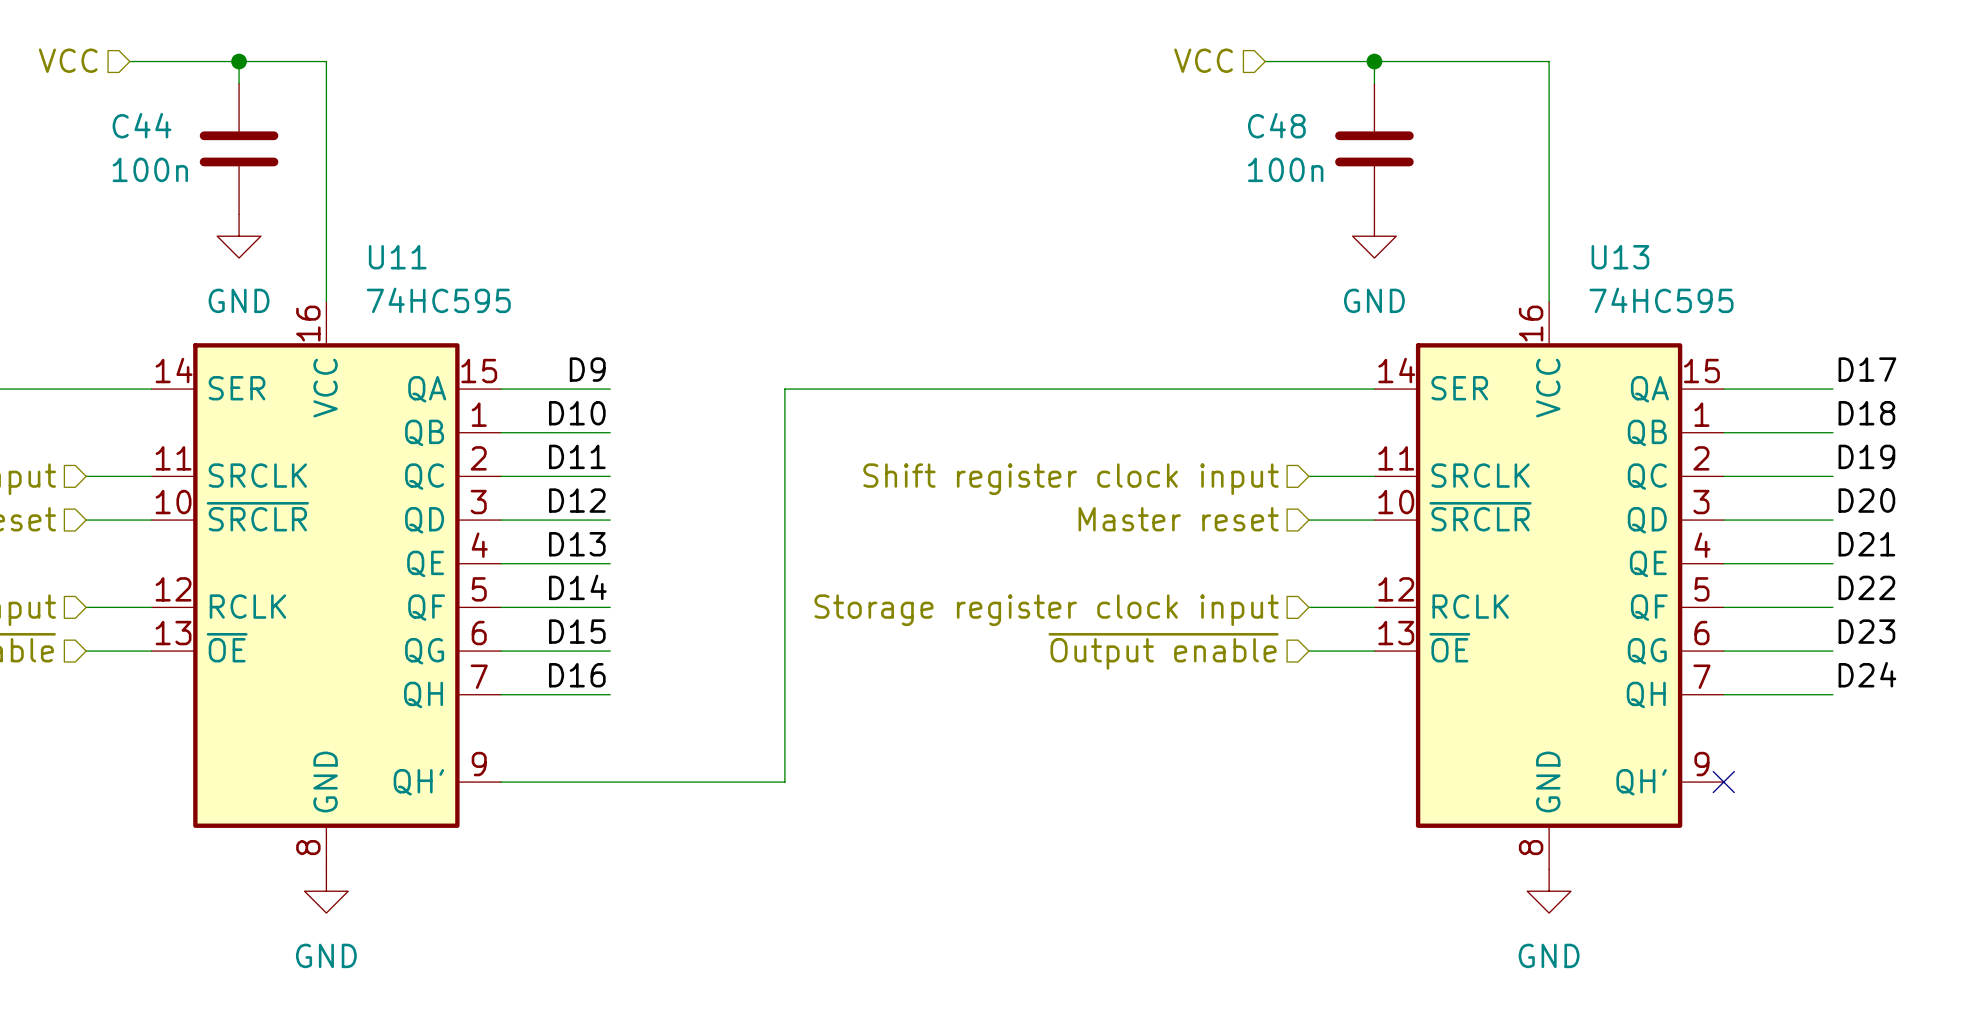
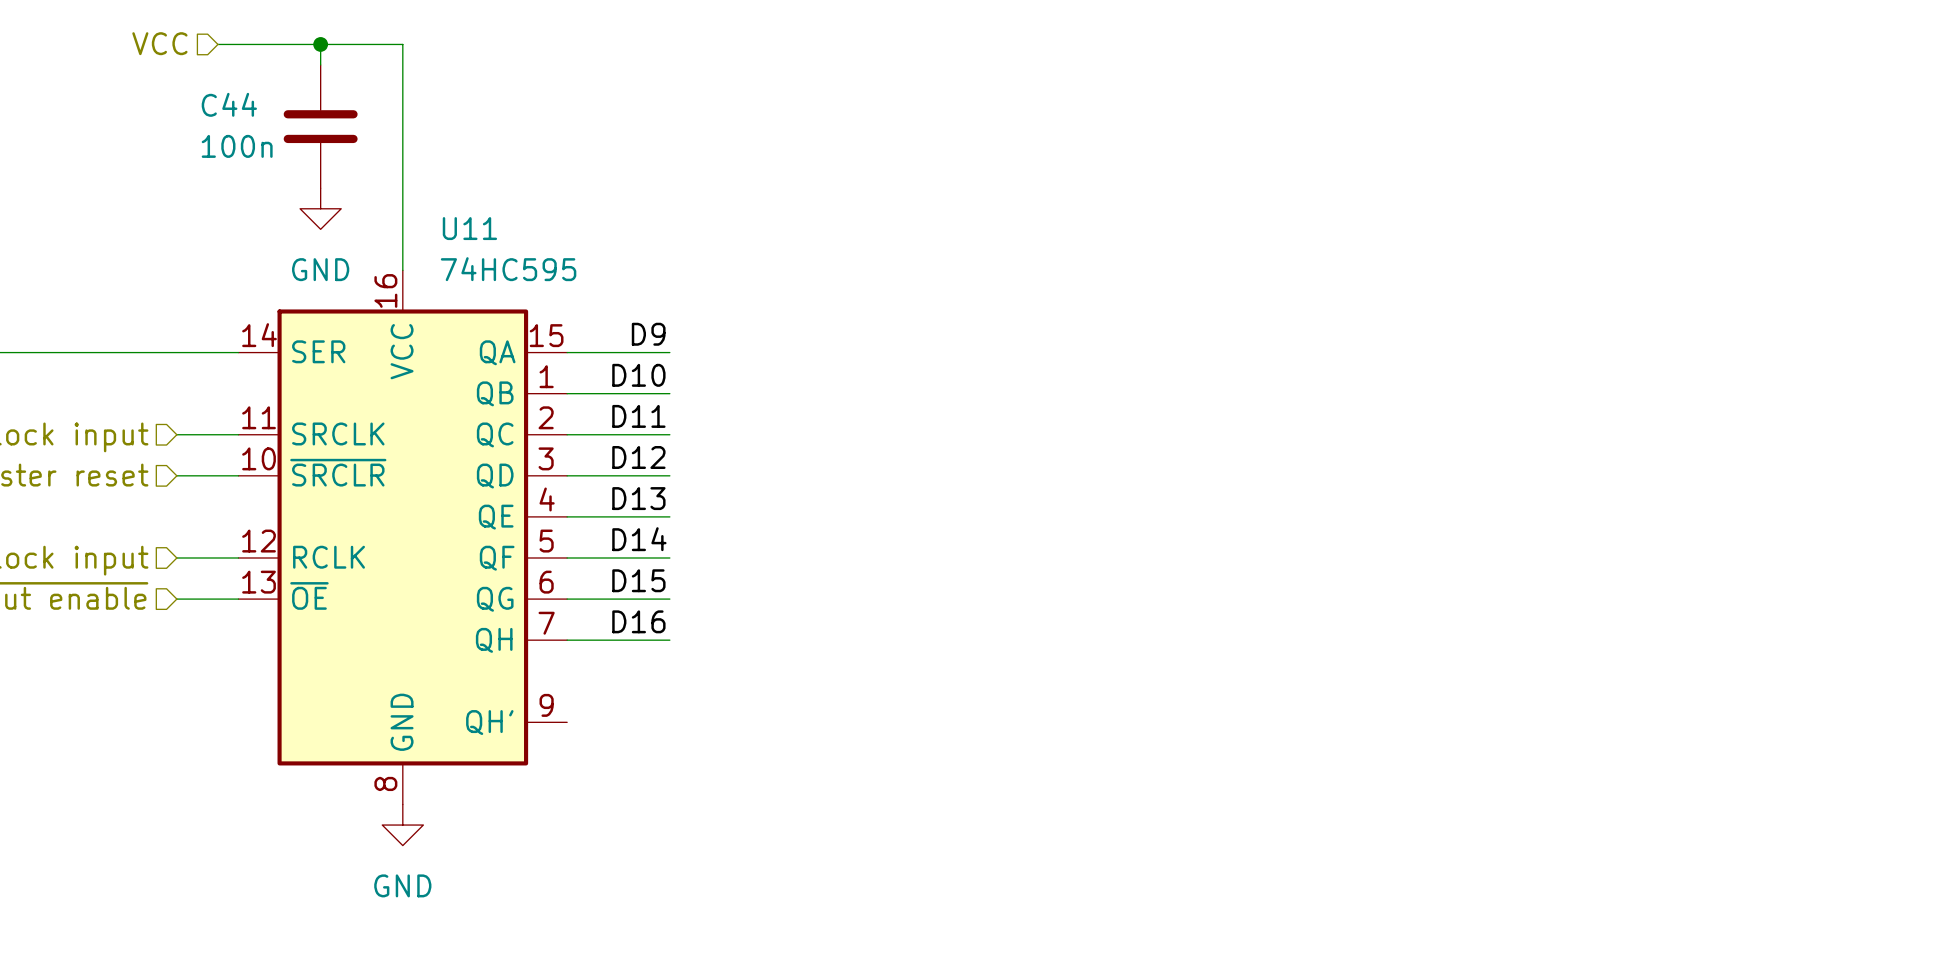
hierarchical label: VCC (1203, 60) -> none
wire: (1265, 61) (1549, 61) (1549, 301) -> none
wire: (1374, 61) (1374, 83) -> none
junction: (1374, 61) -> none
C48: 100n (1374, 148) -> none
power symbol: GND (1374, 236) -> none
label: D17 (1867, 369) -> none
wire: (1374, 389) (784, 389) (784, 782) (501, 782) -> none
wire: (1723, 389) (1832, 389) -> none
label: D18 (1866, 413) -> none
wire: (1723, 432) (1832, 432) -> none
label: D19 (1866, 456) -> none
wire: (1308, 476) (1374, 476) -> none
wire: (1723, 476) (1832, 476) -> none
hierarchical label: Shift register clock input (1071, 479) -> none
label: D20 (1866, 500) -> none
hierarchical label: Master reset (1178, 519) -> none
wire: (1308, 520) (1374, 520) -> none
wire: (1723, 520) (1832, 520) -> none
label: D21 (1866, 544) -> none
wire: (1723, 563) (1832, 563) -> none
U13: 74HC595 (1549, 585) -> none
label: D22 (1866, 587) -> none
wire: (1308, 607) (1374, 607) -> none
wire: (1723, 607) (1832, 607) -> none
hierarchical label: Storage register clock input (1046, 610) -> none
label: D23 (1866, 631) -> none
hierarchical label: ~{Output enable} (1163, 651) -> none
wire: (1308, 651) (1374, 651) -> none
wire: (1723, 651) (1832, 651) -> none
label: D24 (1867, 674) -> none
wire: (1723, 694) (1832, 694) -> none
no-connect mark: (1723, 782) -> none
power symbol: GND (1549, 891) -> none

